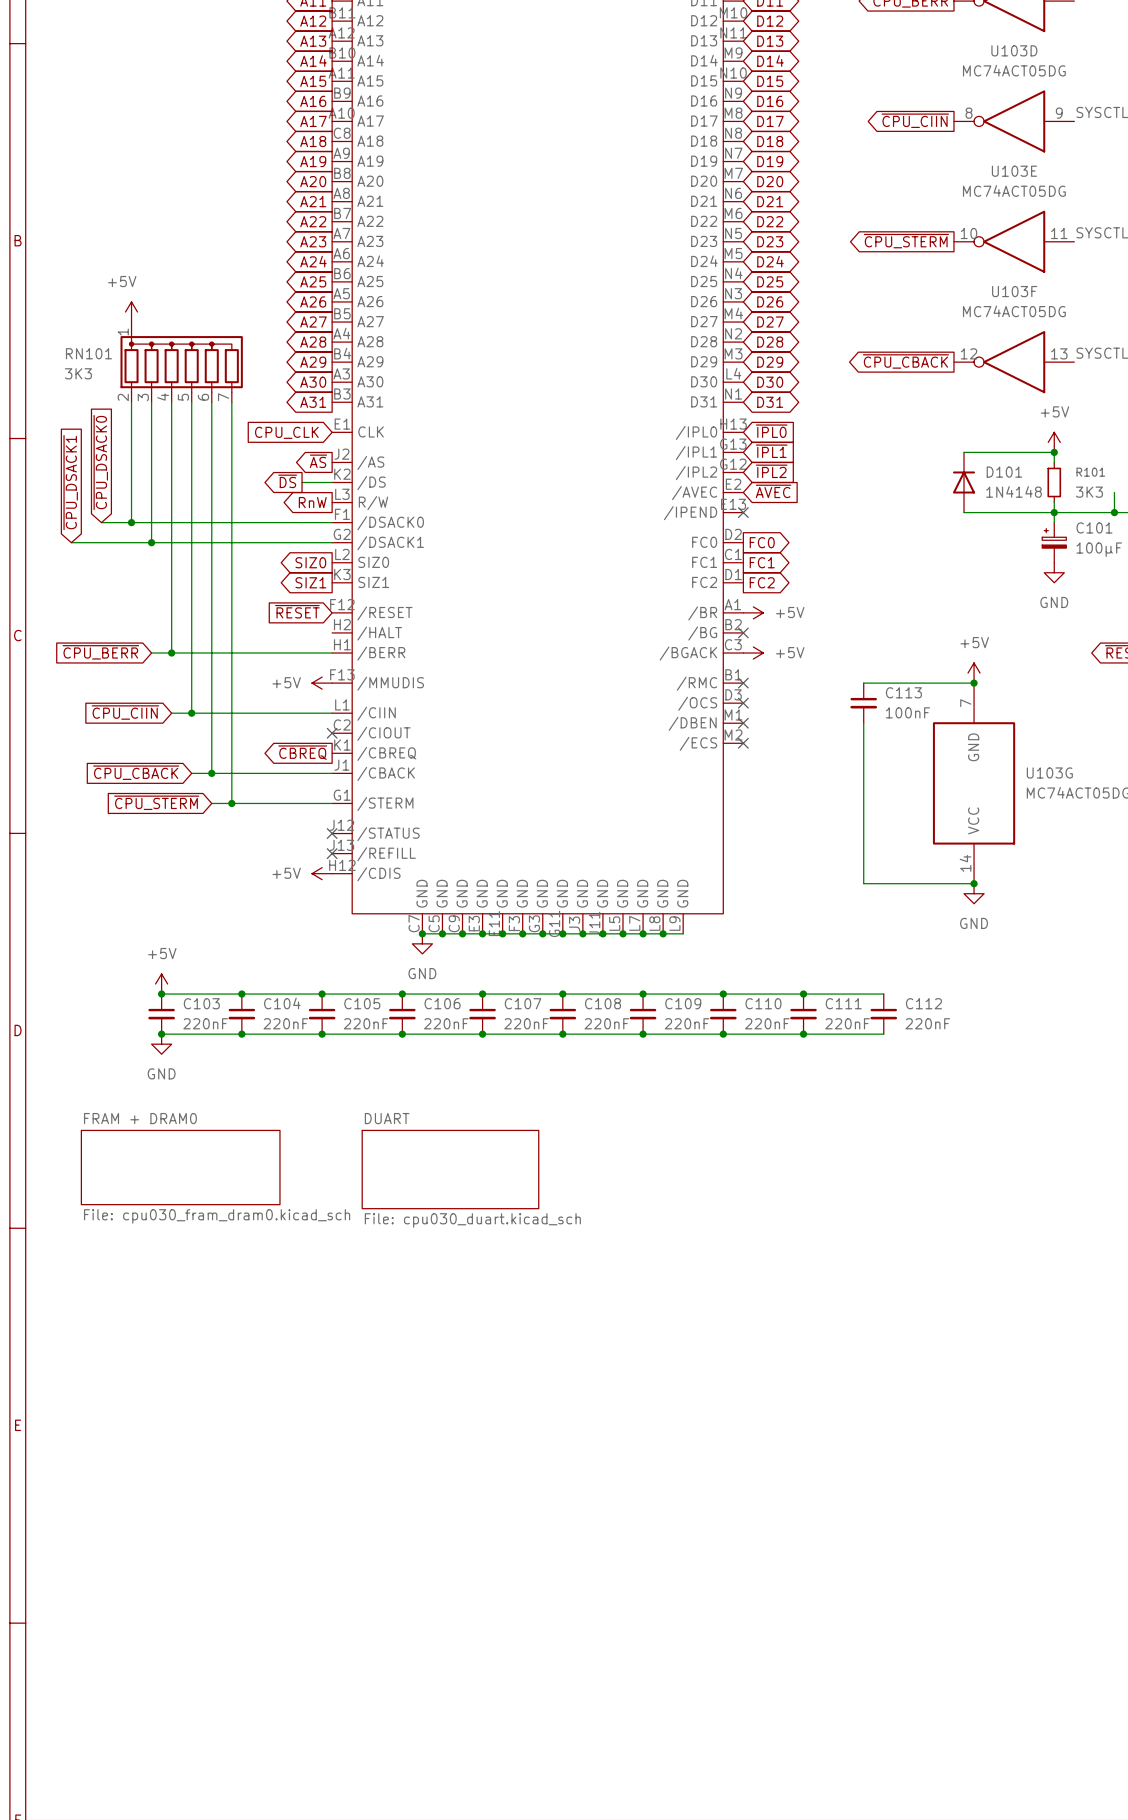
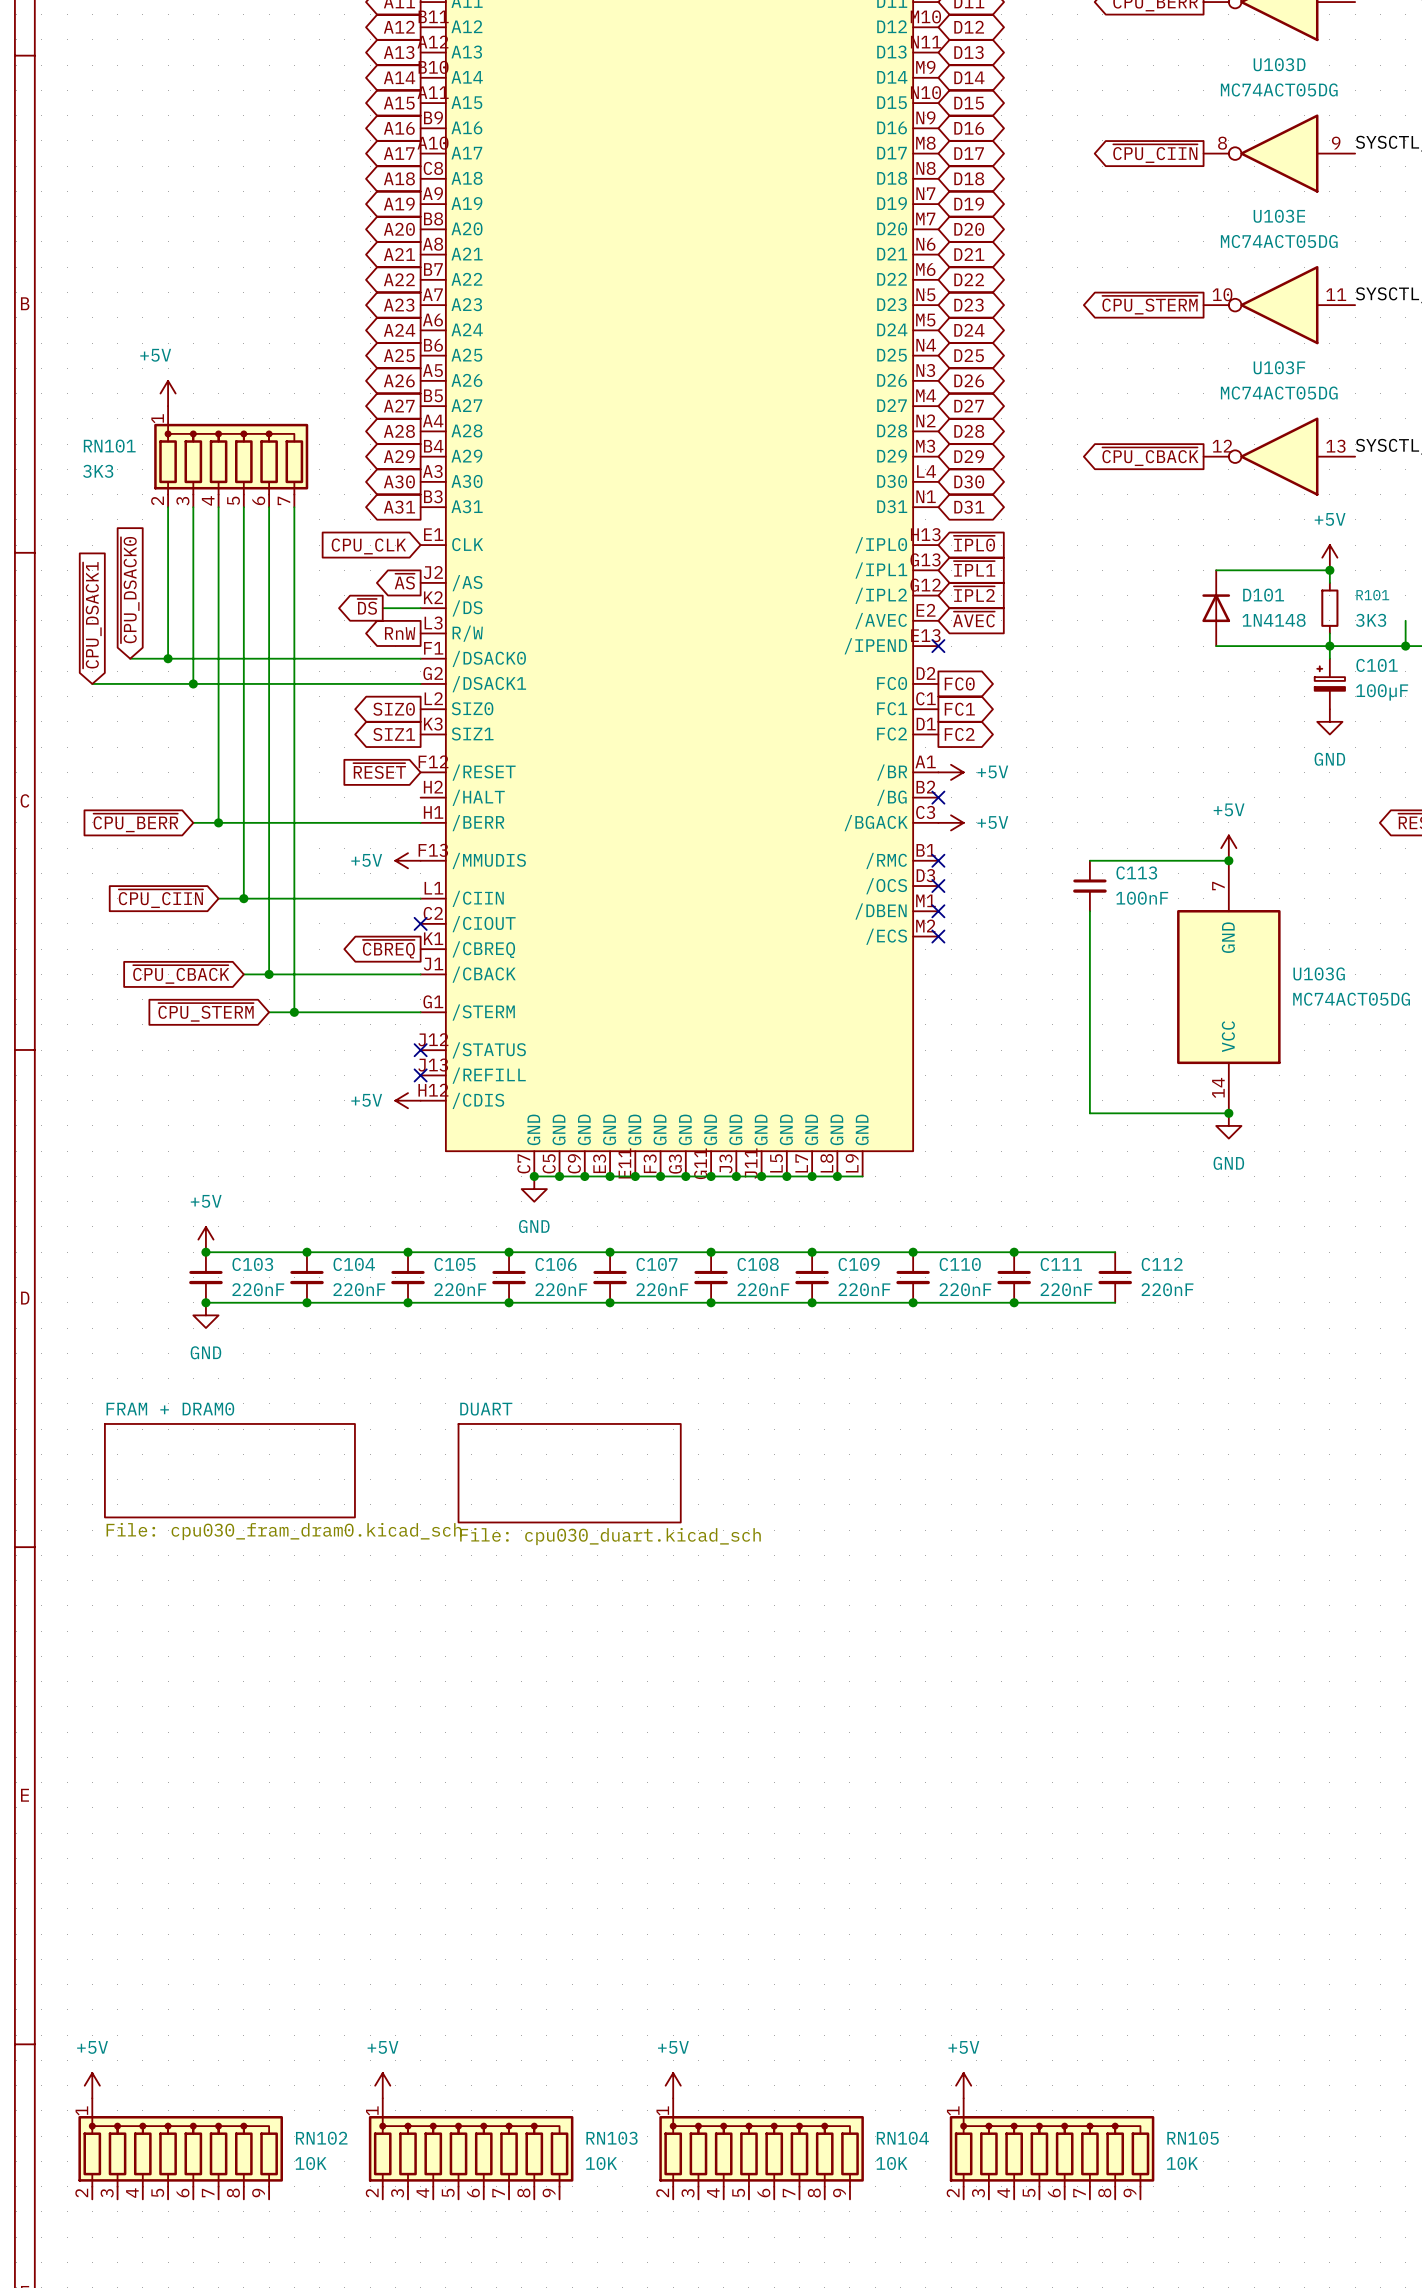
power symbol: none -> +5V (92, 2085)
power symbol: none -> +5V (382, 2085)
power symbol: none -> +5V (673, 2085)
power symbol: none -> +5V (963, 2085)
RN102: none -> 10K (180, 2148)
RN103: none -> 10K (471, 2148)
RN104: none -> 10K (761, 2148)
RN105: none -> 10K (1052, 2148)

